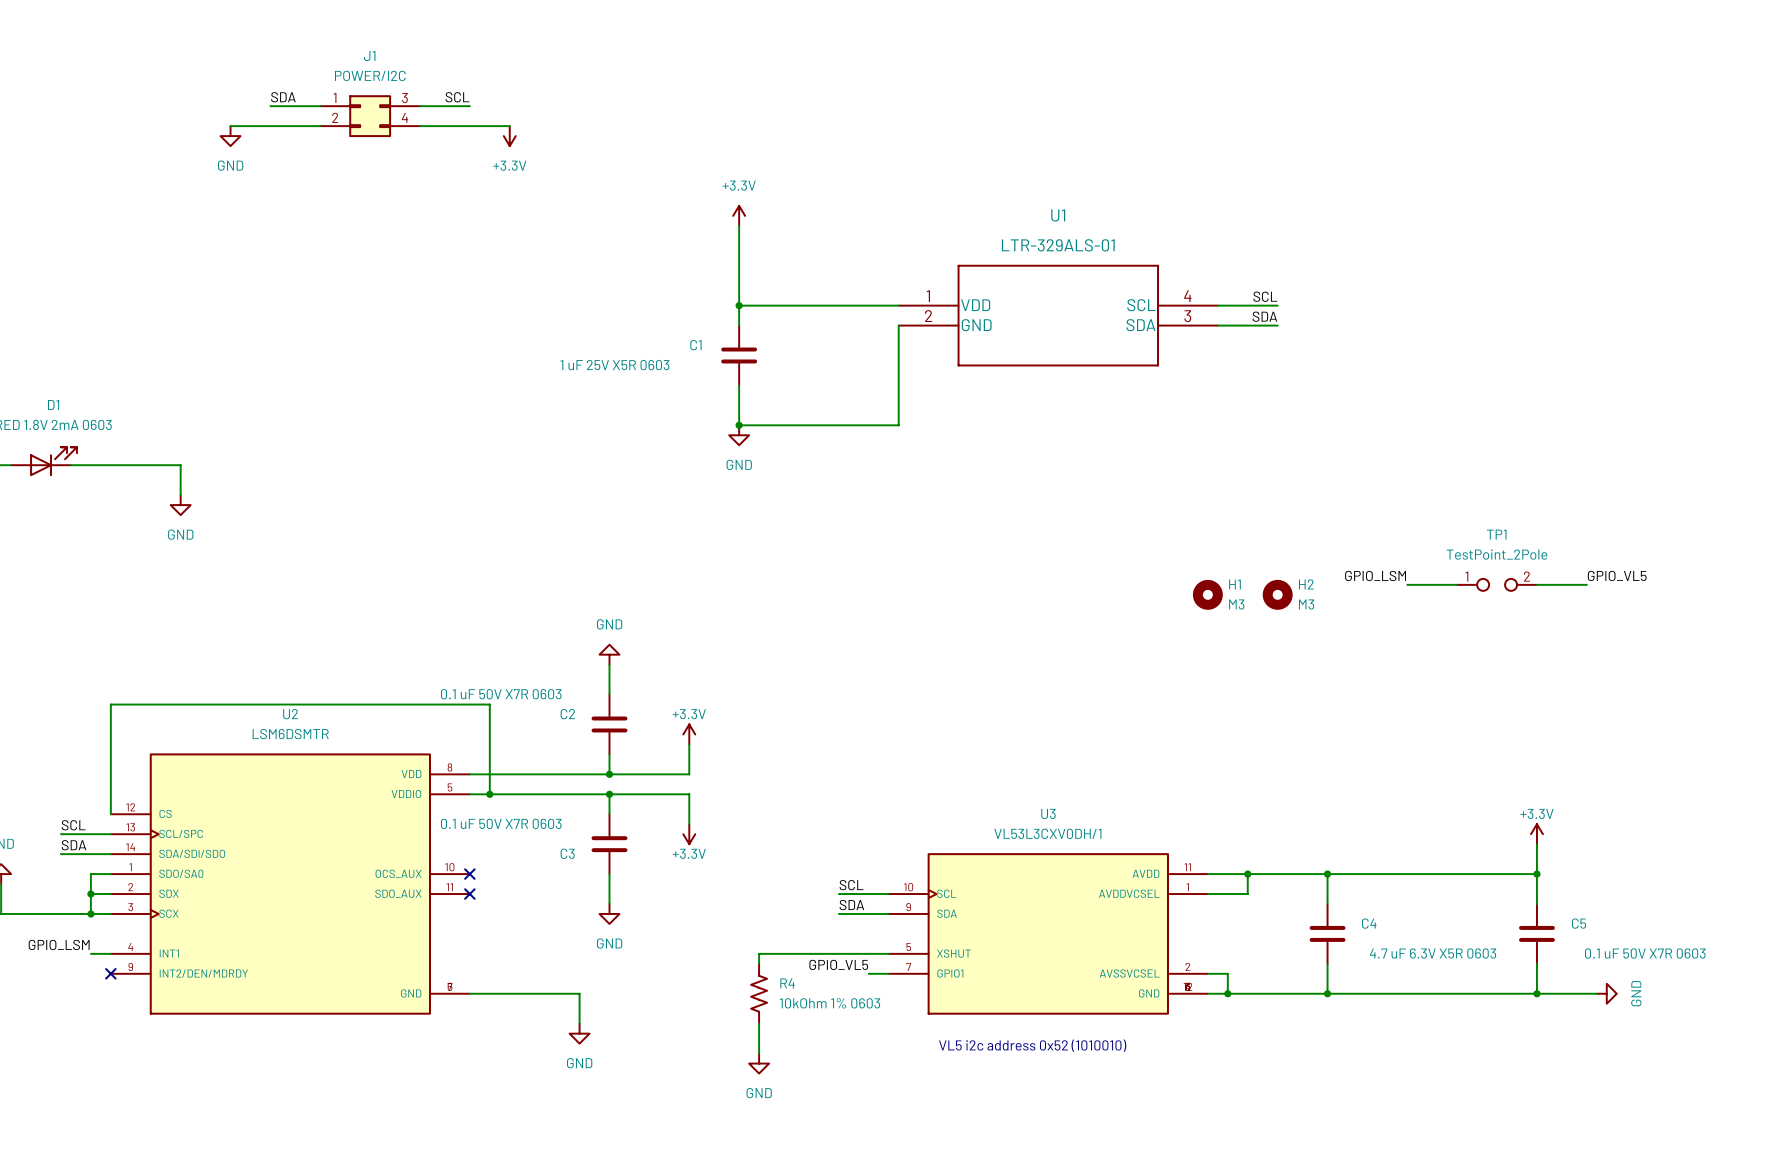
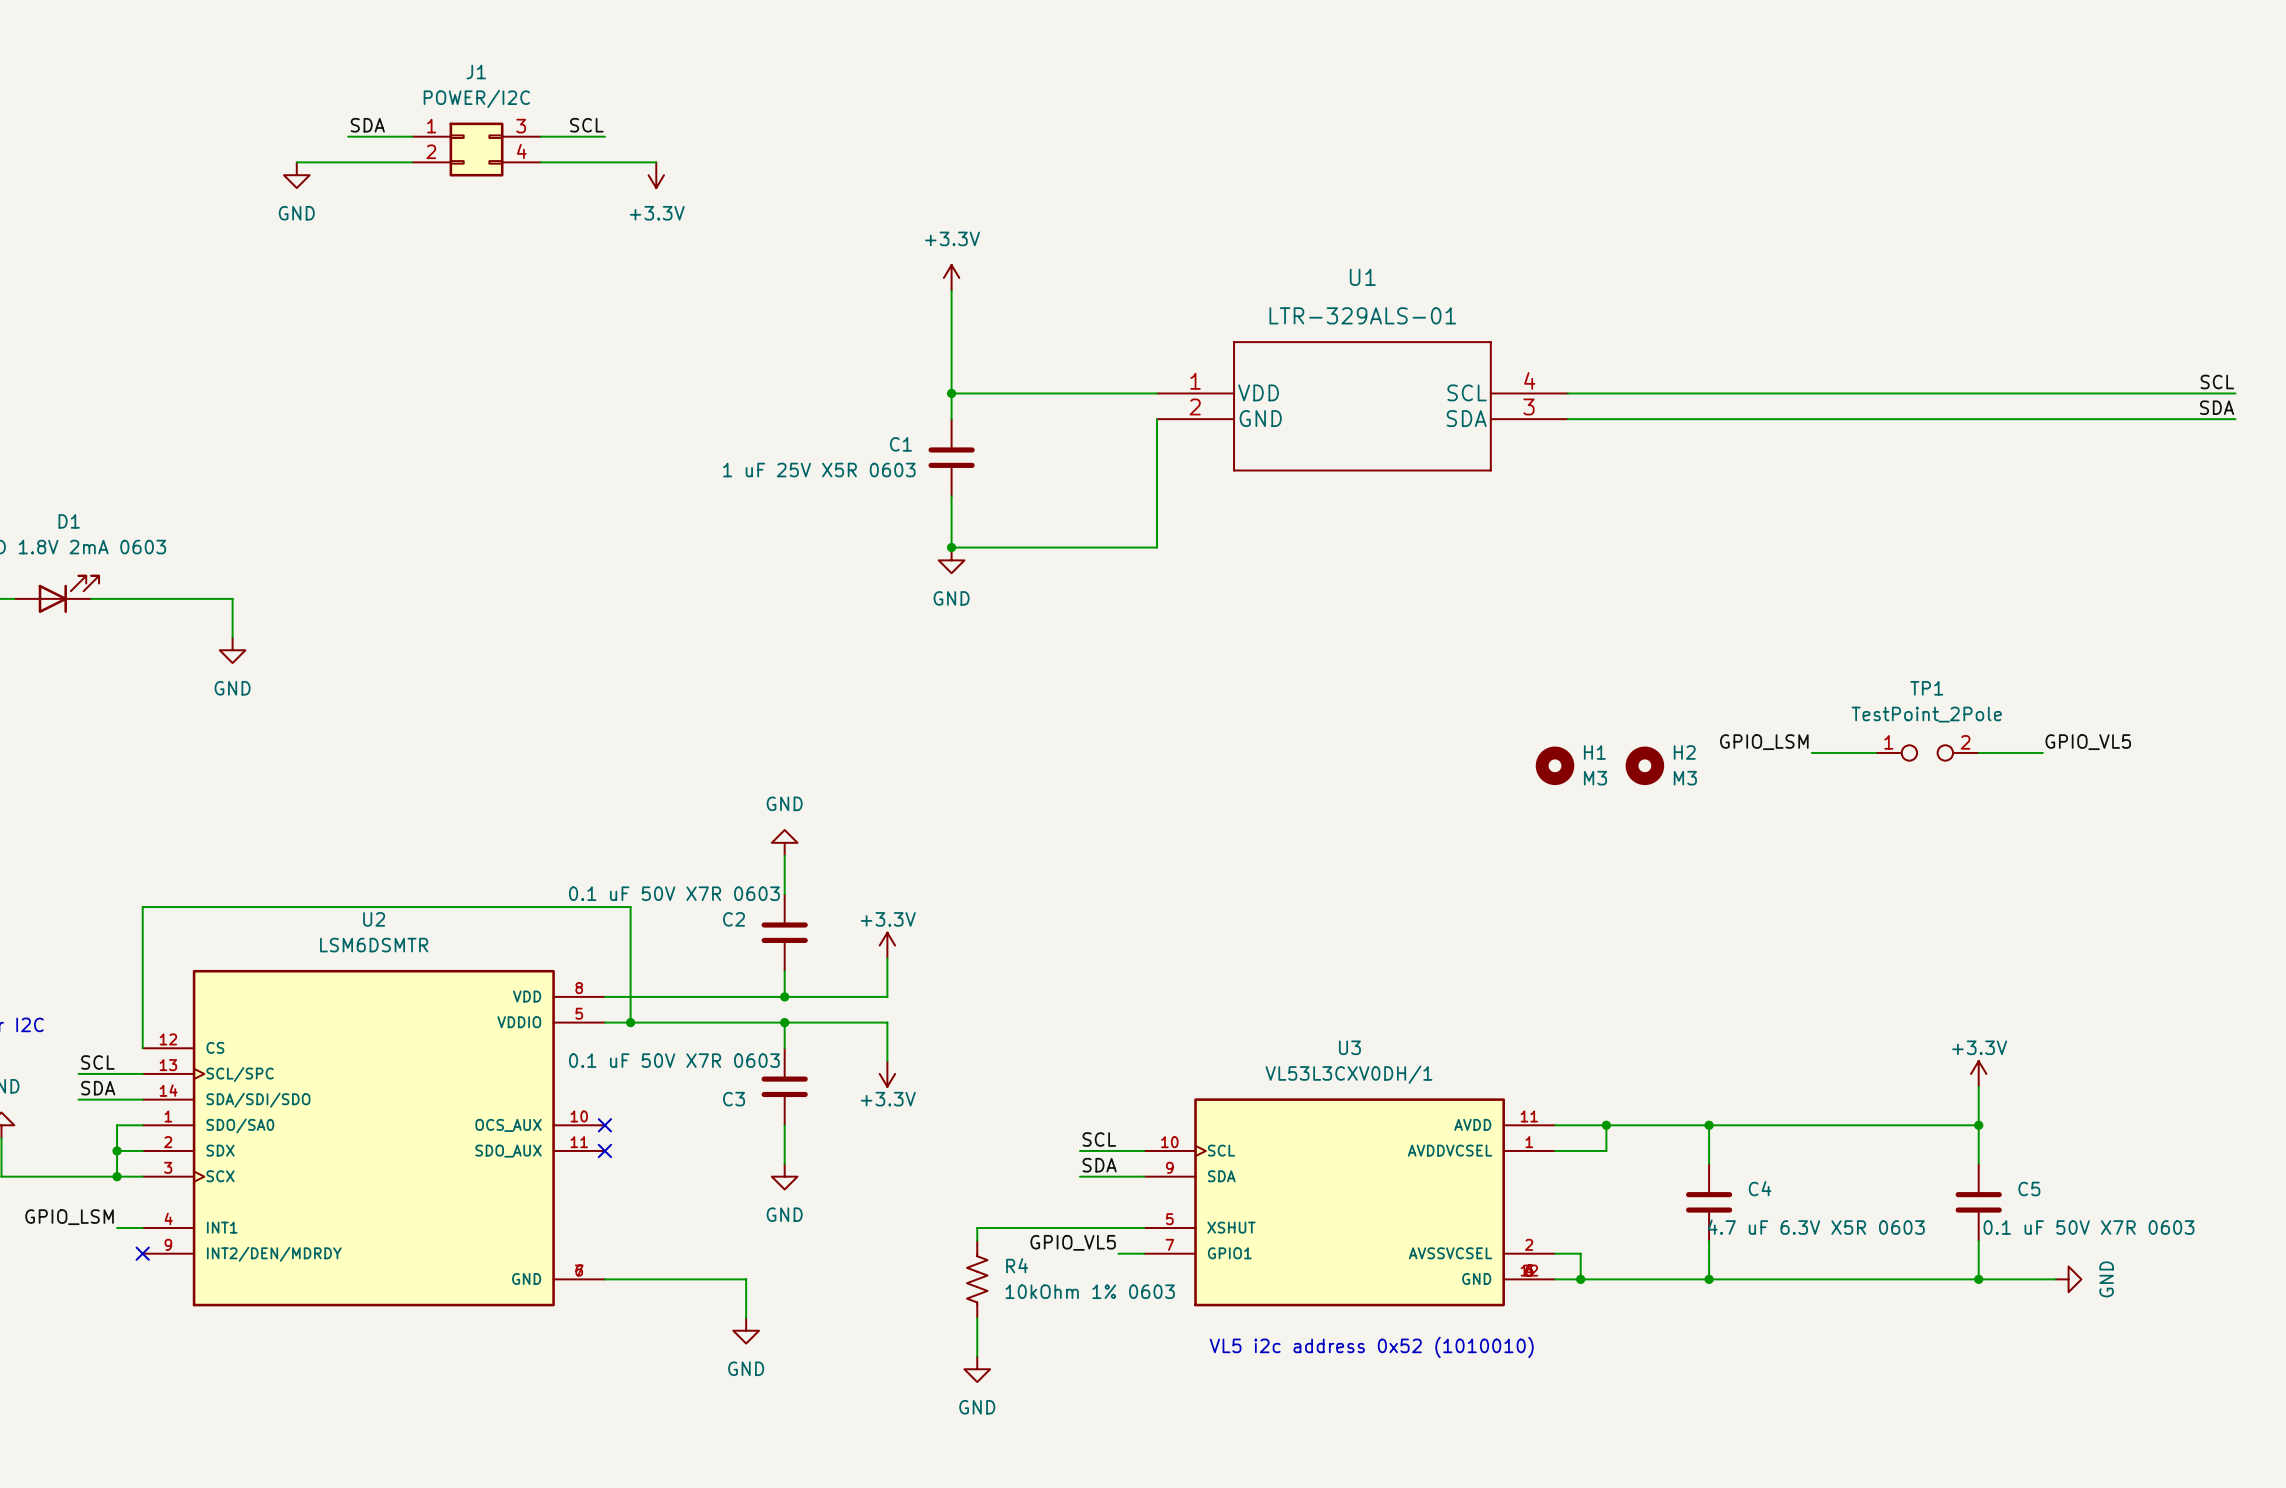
label: SCL (1265, 296) -> none
label: none -> SCL (2217, 382)
wire: none -> (1644, 393) (2235, 393)
label: SDA (1264, 316) -> none
label: none -> SDA (2217, 407)
wire: none -> (1644, 419) (2235, 419)

